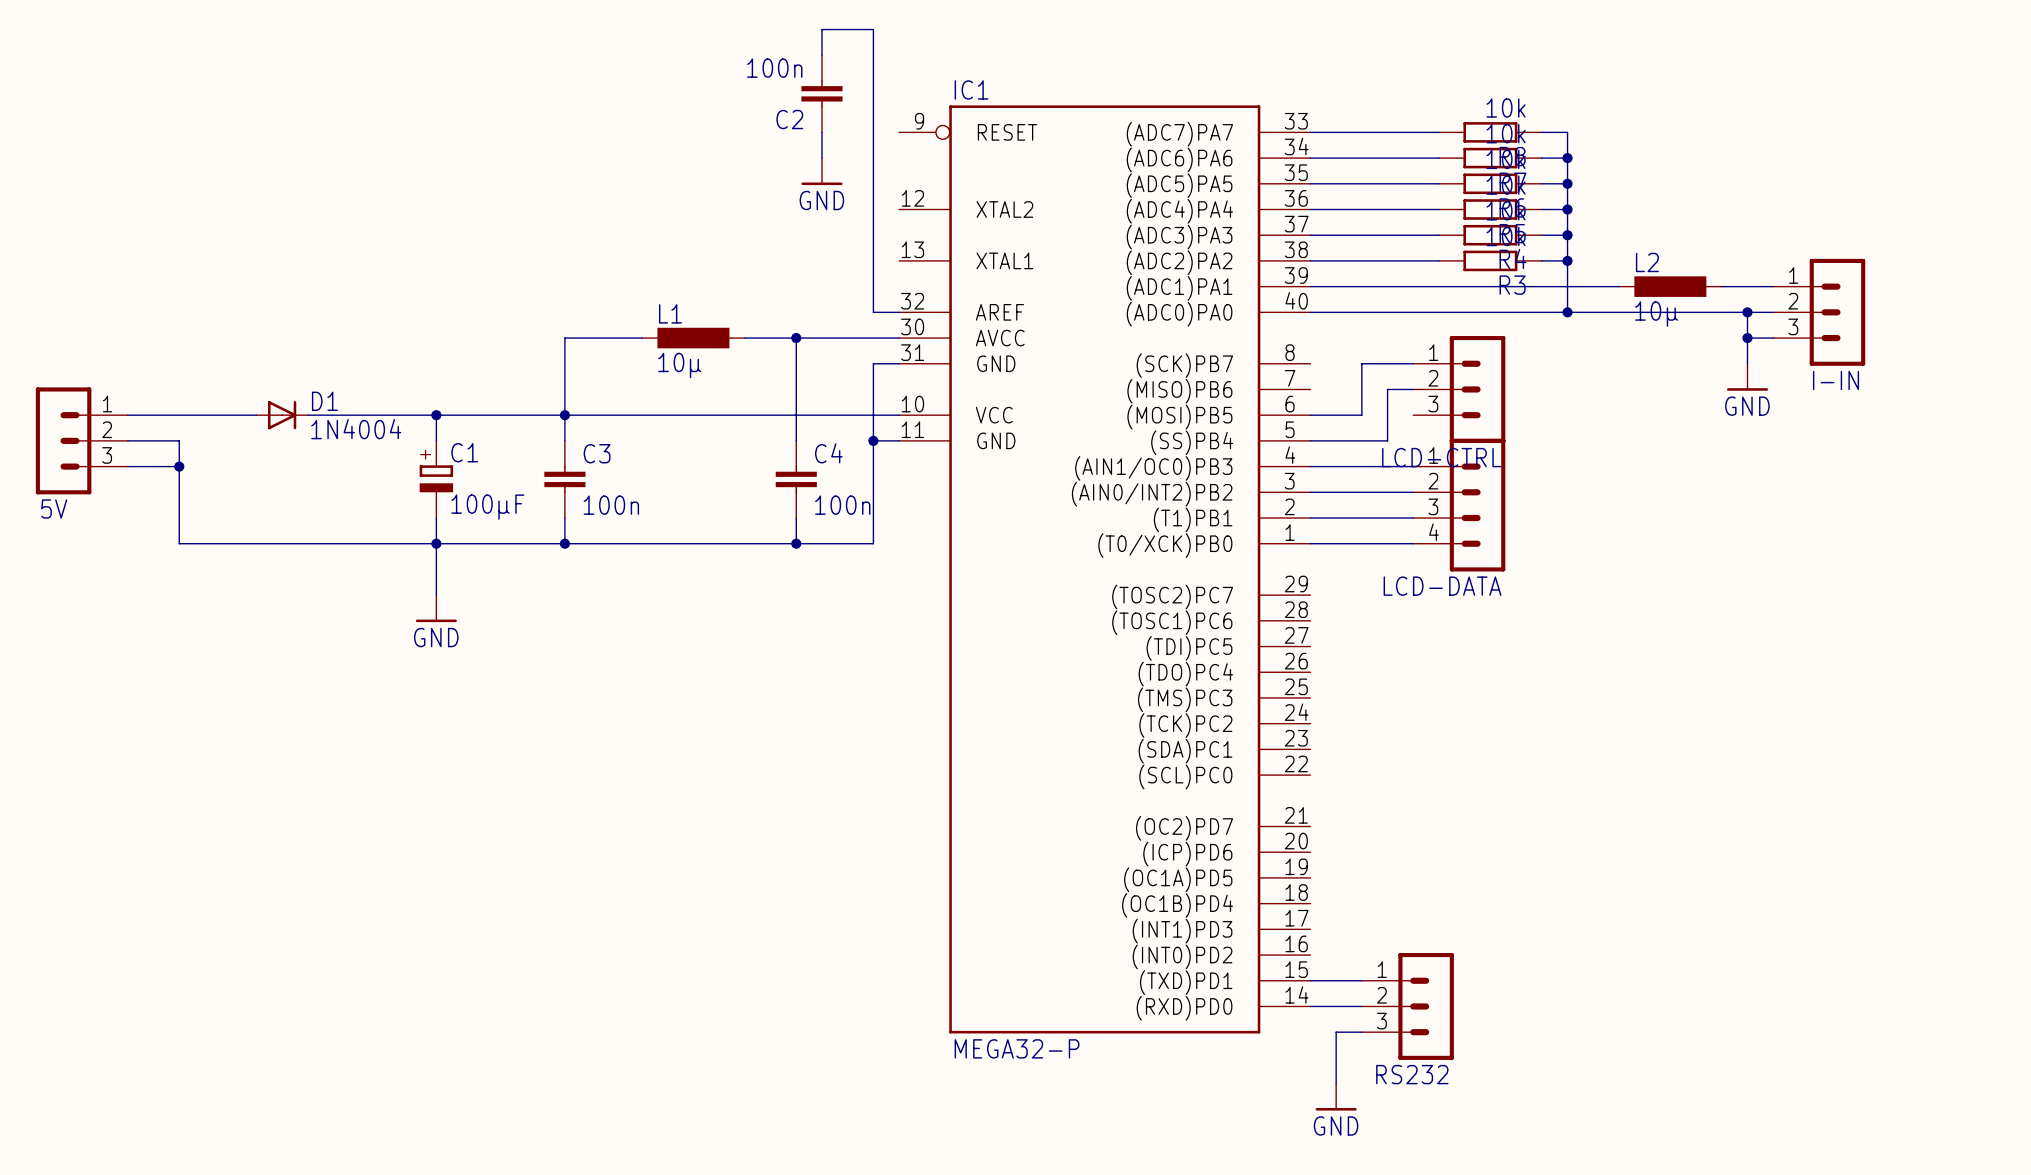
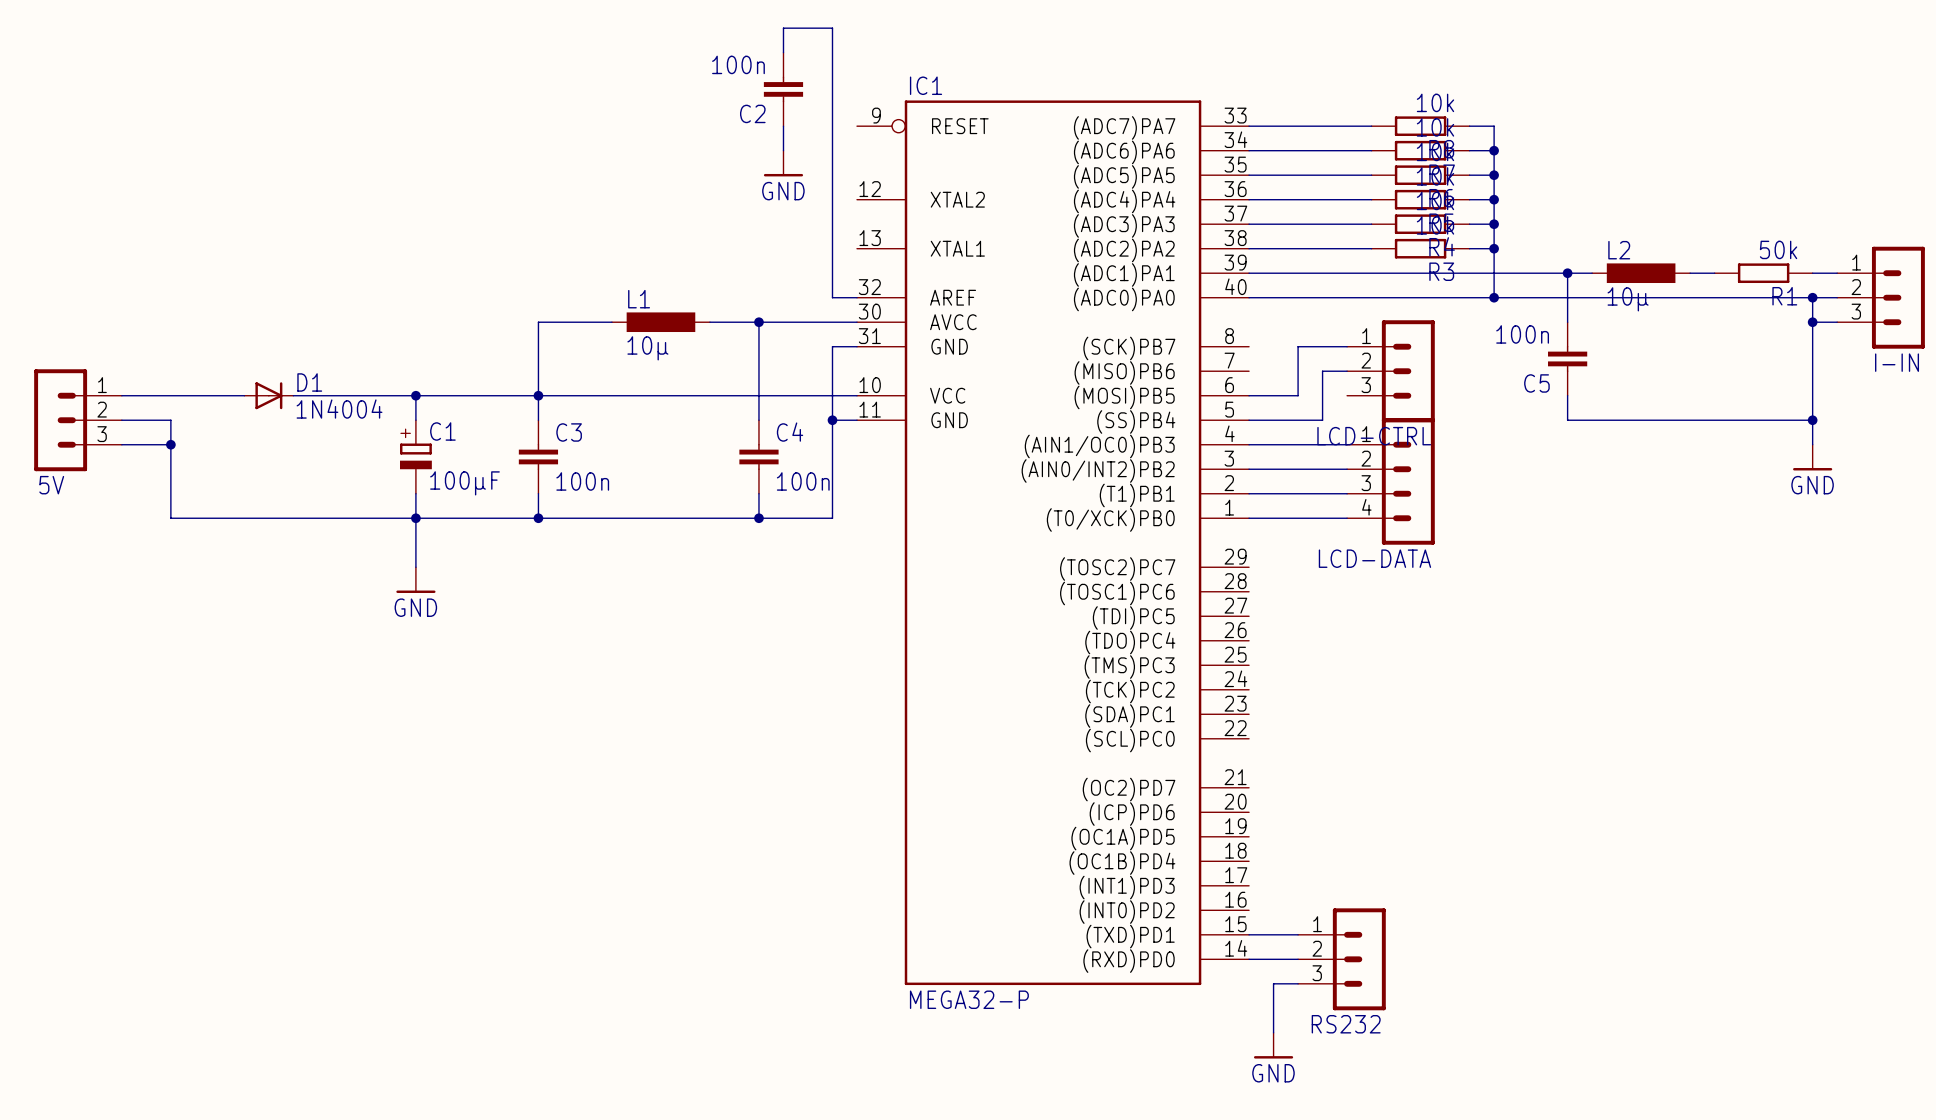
junction: none -> (1567, 273)
L2 position: (1670, 286) -> (1641, 273)
R1: none -> 50k (1763, 273)
wire: none -> (1812, 273) (1837, 273)
wire: (1747, 312) (1747, 363) -> (1567, 273) (1567, 322)
junction: (1747, 312) -> none
wire: none -> (1690, 297) (1837, 297)
I-IN position: (1819, 312) -> (1881, 297)
wire: none -> (1812, 297) (1812, 444)
junction: none -> (1812, 297)
wire: (1747, 338) (1773, 338) -> (1812, 322) (1837, 322)
junction: (1747, 338) -> none
junction: none -> (1812, 322)
C5: none -> 100n (1567, 358)
power symbol position: GND (1747, 377) -> GND (1812, 457)
wire: none -> (1567, 395) (1567, 420) (1812, 420)
junction: none -> (1812, 420)

